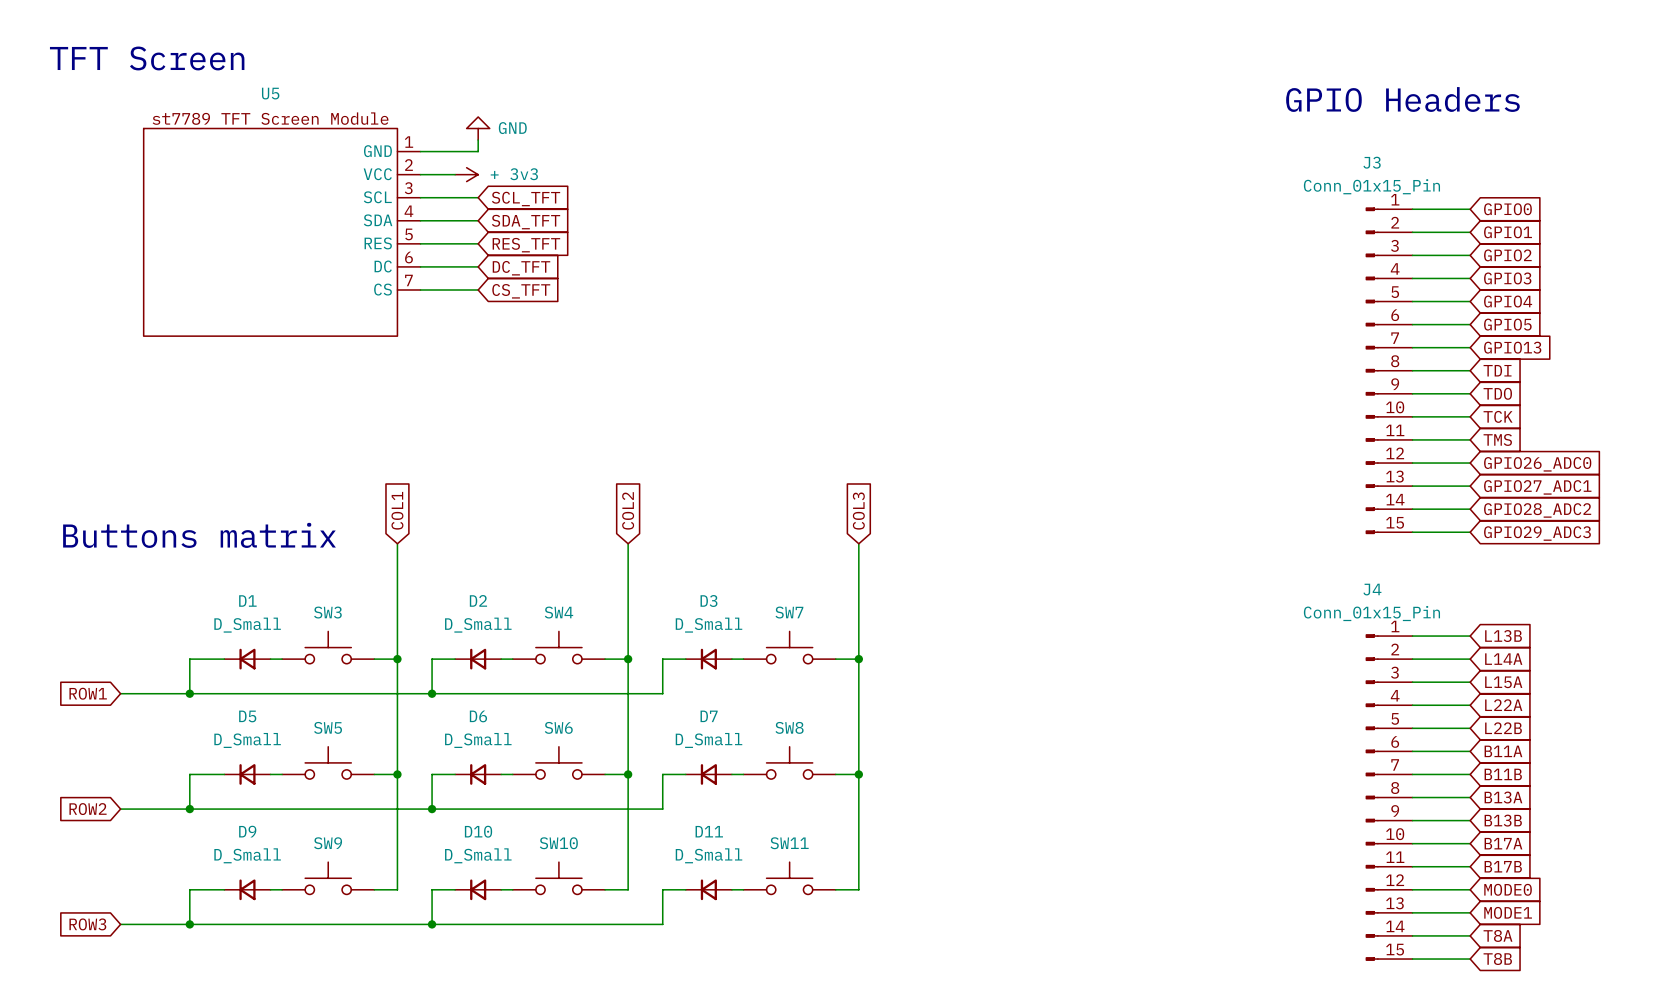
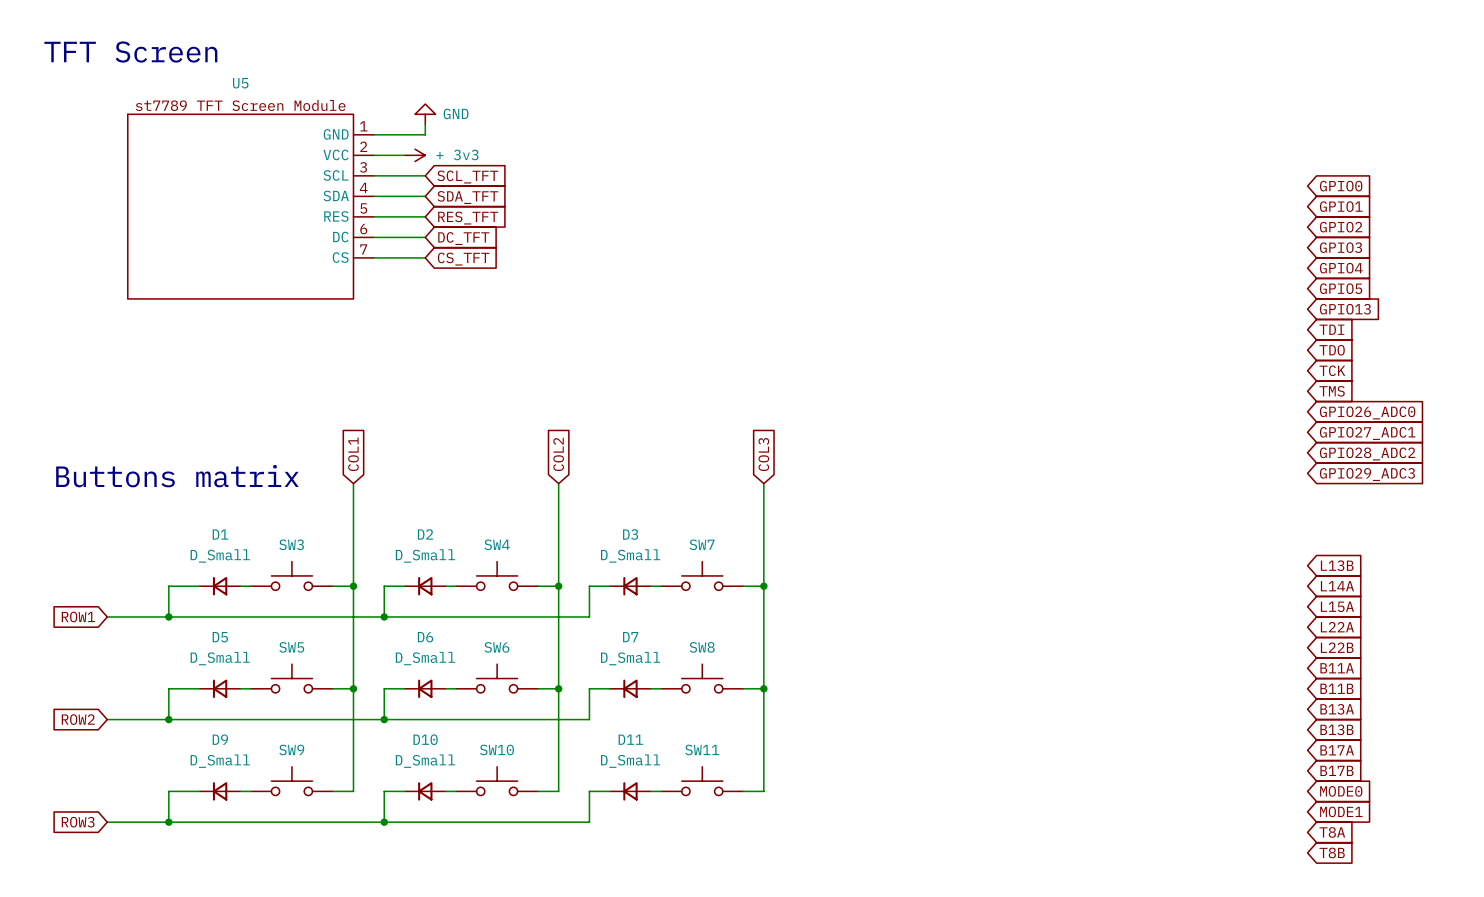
text: GPIO Headers (1402, 99) -> none
wire: (1412, 209) (1470, 209) -> none
wire: (1412, 232) (1470, 232) -> none
wire: (1412, 255) (1470, 255) -> none
wire: (1412, 278) (1470, 278) -> none
wire: (1412, 301) (1470, 301) -> none
wire: (1412, 324) (1470, 324) -> none
wire: (1412, 347) (1470, 347) -> none
J3: Conn_01x15_Pin (1389, 370) -> none
wire: (1412, 370) (1470, 370) -> none
wire: (1412, 393) (1470, 393) -> none
wire: (1412, 416) (1470, 416) -> none
wire: (1412, 439) (1470, 439) -> none
wire: (1412, 463) (1470, 463) -> none
wire: (1412, 486) (1470, 486) -> none
wire: (1412, 509) (1470, 509) -> none
wire: (1412, 532) (1470, 532) -> none
wire: (1412, 636) (1470, 636) -> none
wire: (1412, 659) (1470, 659) -> none
wire: (1412, 682) (1470, 682) -> none
wire: (1412, 705) (1470, 705) -> none
wire: (1412, 728) (1470, 728) -> none
wire: (1412, 751) (1470, 751) -> none
wire: (1412, 774) (1470, 774) -> none
J4: Conn_01x15_Pin (1389, 797) -> none
wire: (1412, 797) (1470, 797) -> none
wire: (1412, 820) (1470, 820) -> none
wire: (1412, 843) (1470, 843) -> none
wire: (1412, 866) (1470, 866) -> none
wire: (1412, 889) (1470, 889) -> none
wire: (1412, 912) (1470, 912) -> none
wire: (1412, 935) (1470, 935) -> none
wire: (1412, 959) (1470, 959) -> none

